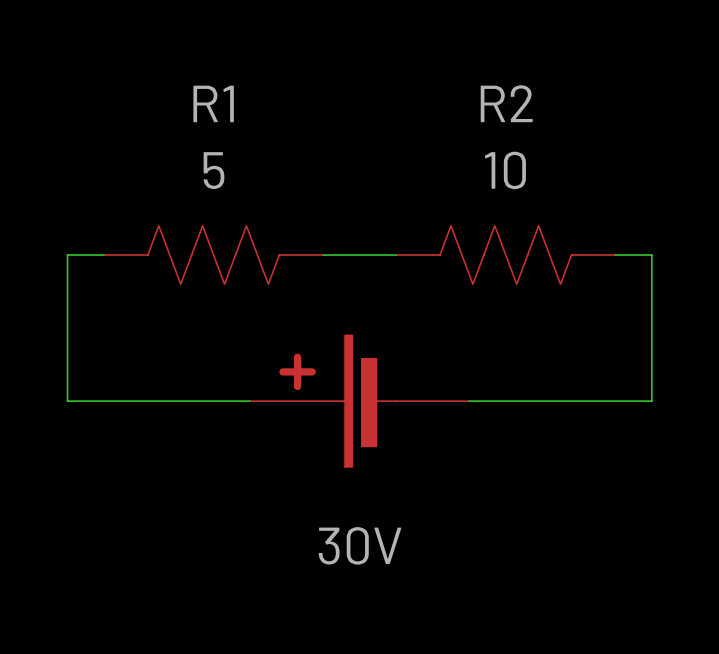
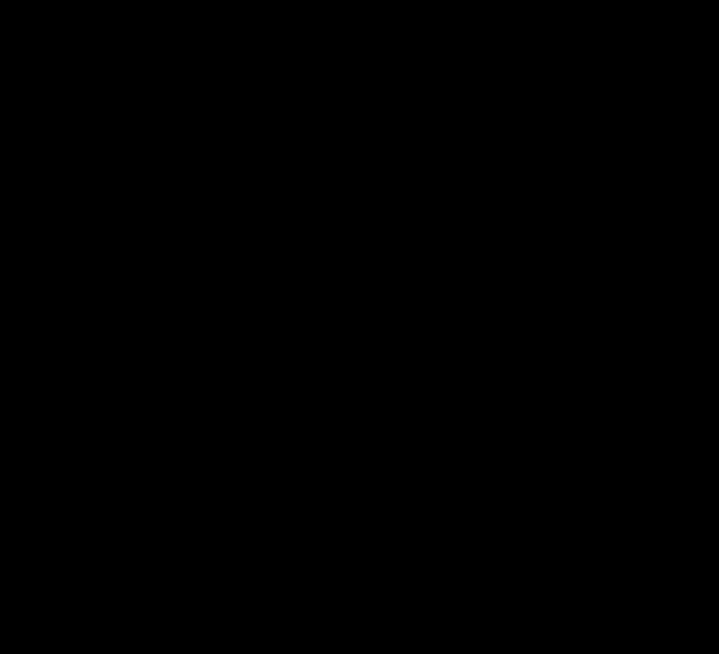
wire: (104, 255) (67, 255) (67, 401) (250, 401) -> none
R1: 5 (213, 255) -> none
wire: (323, 255) (396, 255) -> none
R2: 10 (505, 255) -> none
wire: (615, 255) (651, 255) (651, 401) (469, 401) -> none
part: 30V (359, 401) -> none

